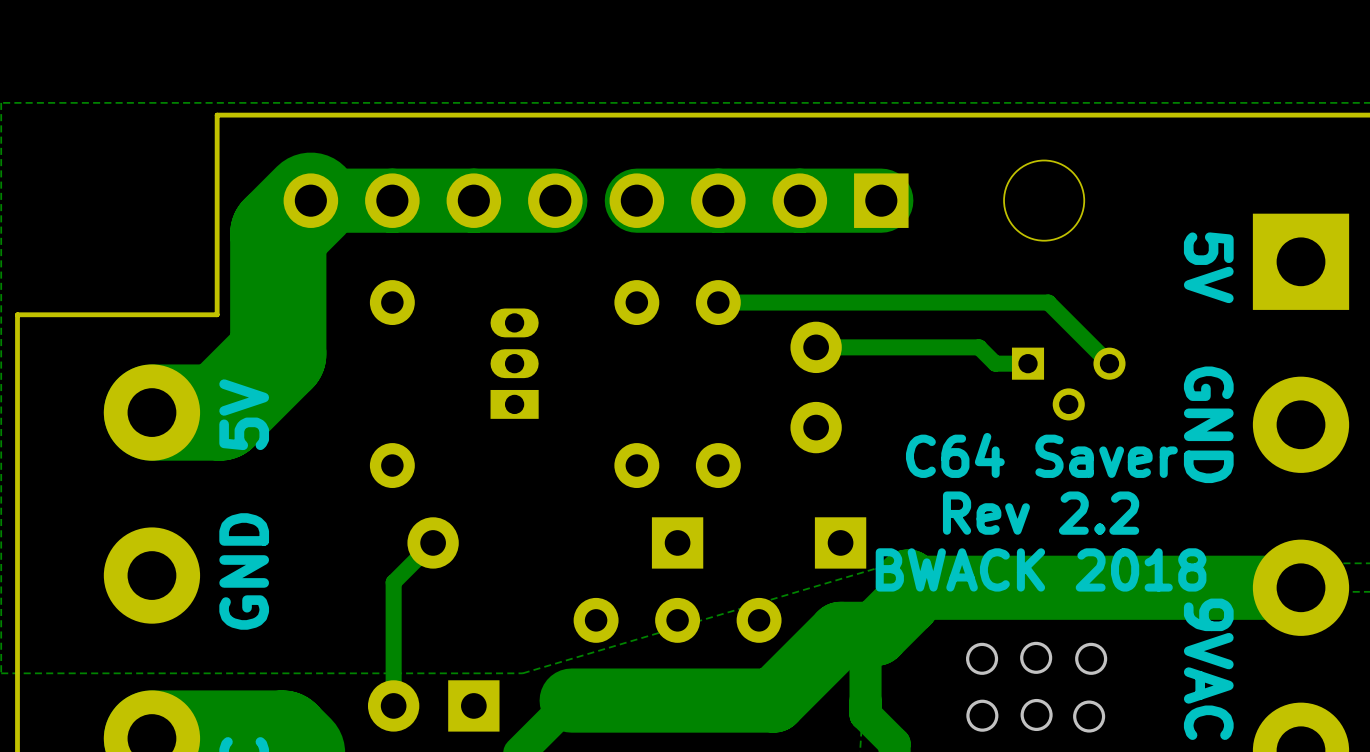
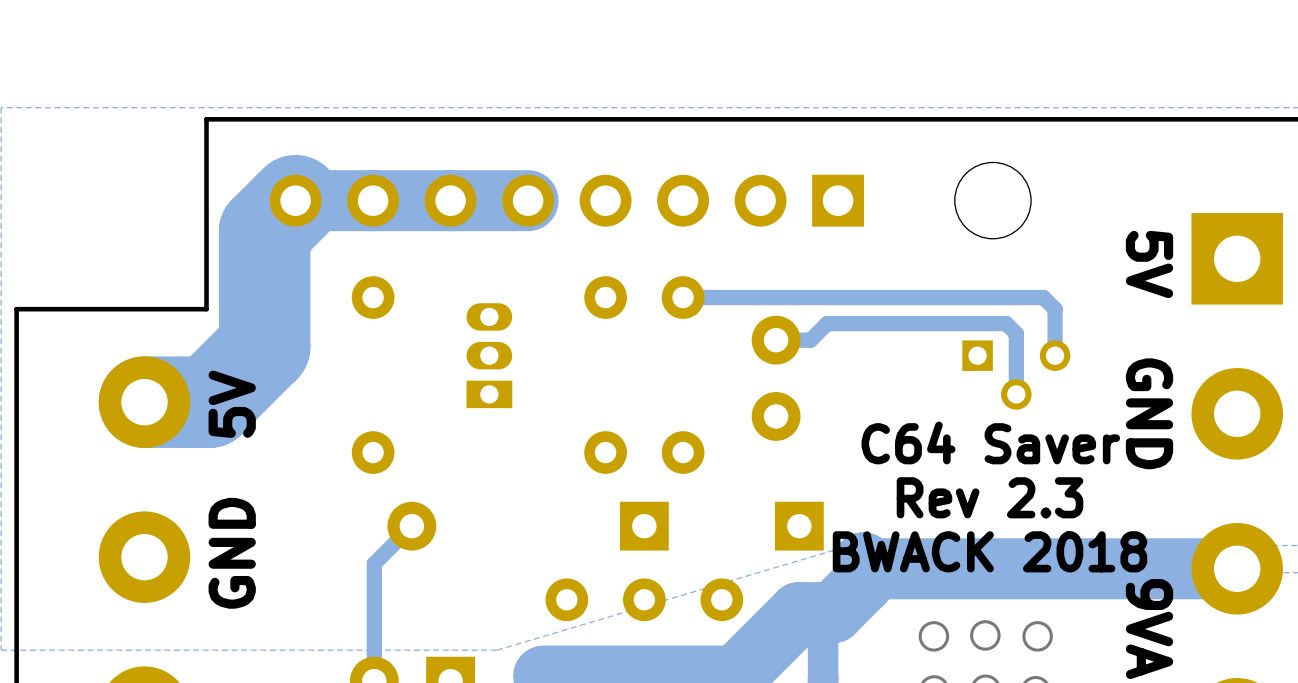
track: (881, 200) (636, 200) -> none
track: (1048, 302) (1109, 363) -> (996, 297) (1043, 297) (1055, 309) (1055, 355)
track: (852, 347) (979, 347) (995, 363) (1028, 363) -> (810, 340) (827, 323) (1006, 323) (1016, 333) (1016, 394)
text: Rev 2.2 (1041, 513) -> Rev 2.3 (990, 497)

